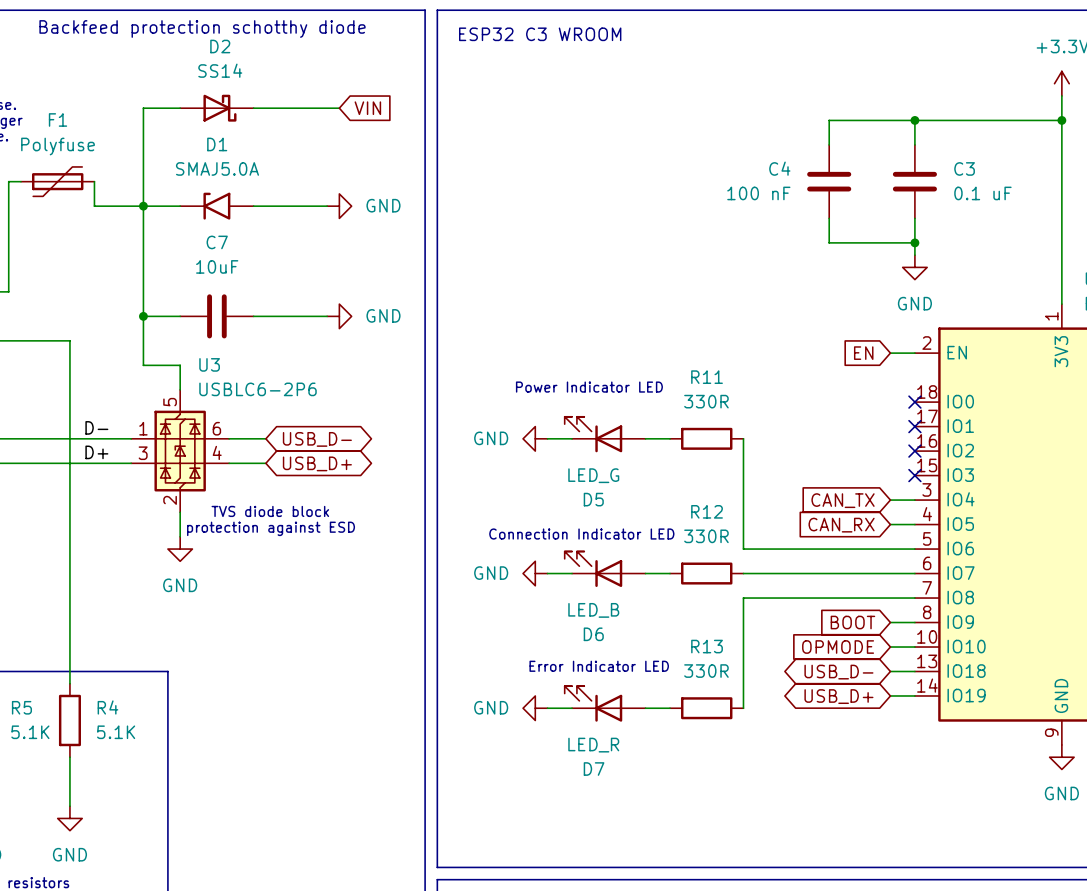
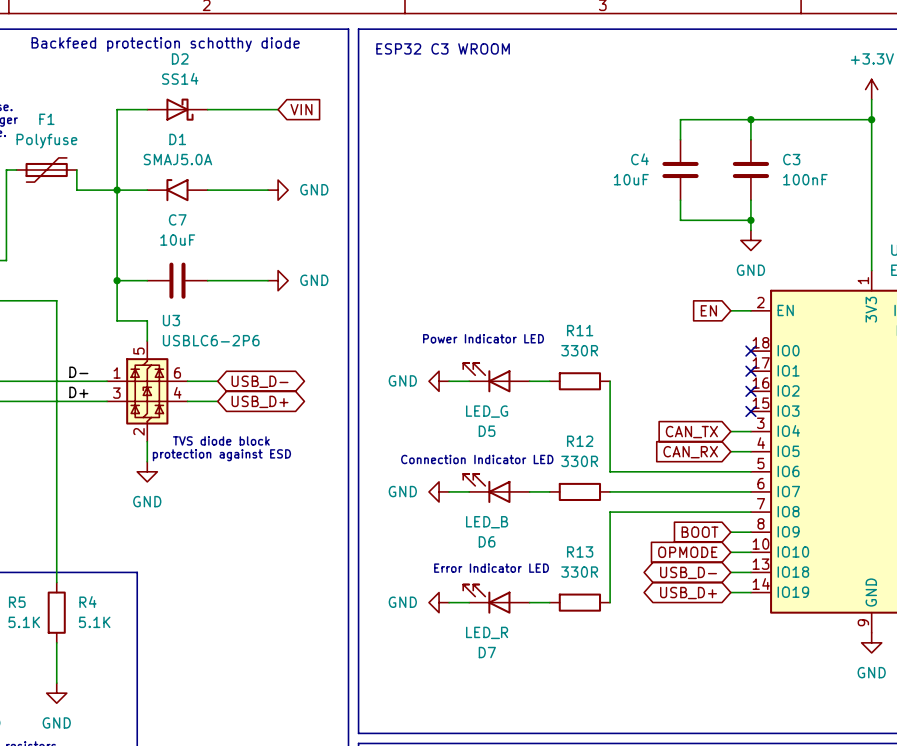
C4 value: 100 nF (758, 193) -> 10uF (631, 179)
C3 value: 0.1 uF (982, 193) -> 100nF (805, 179)

